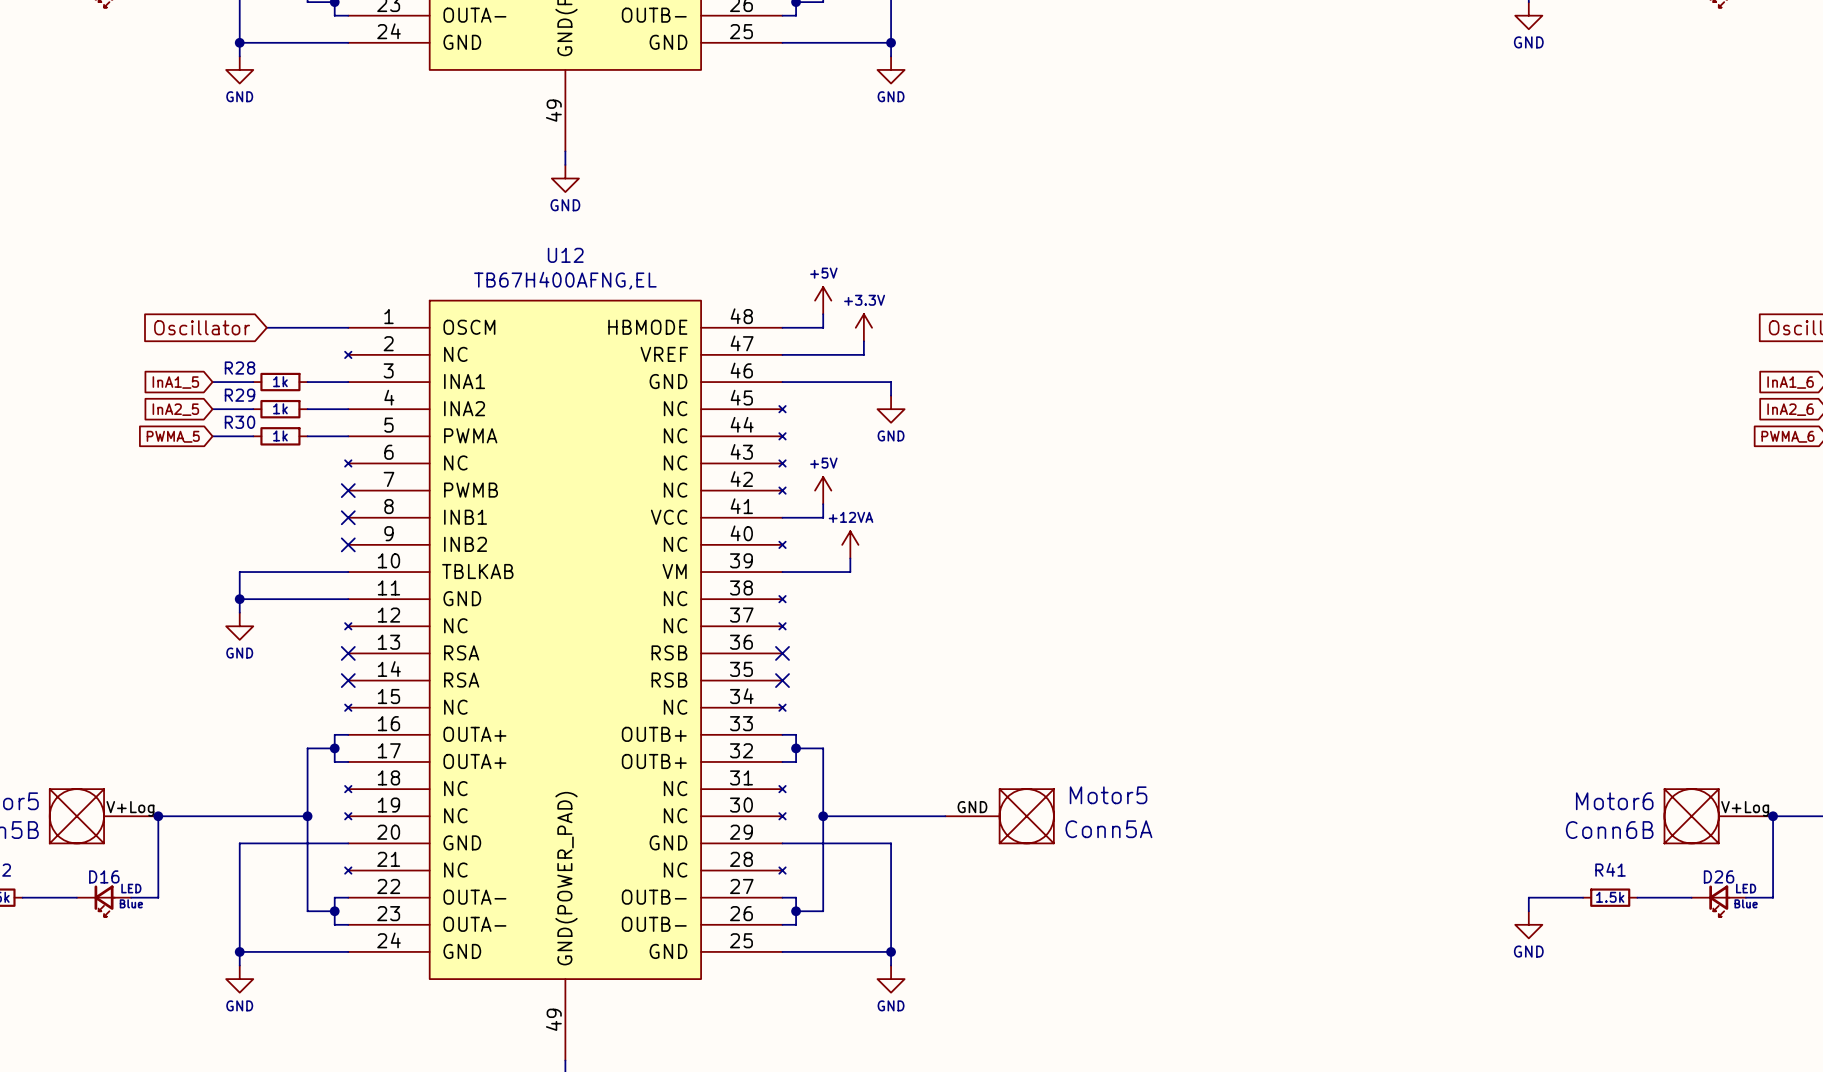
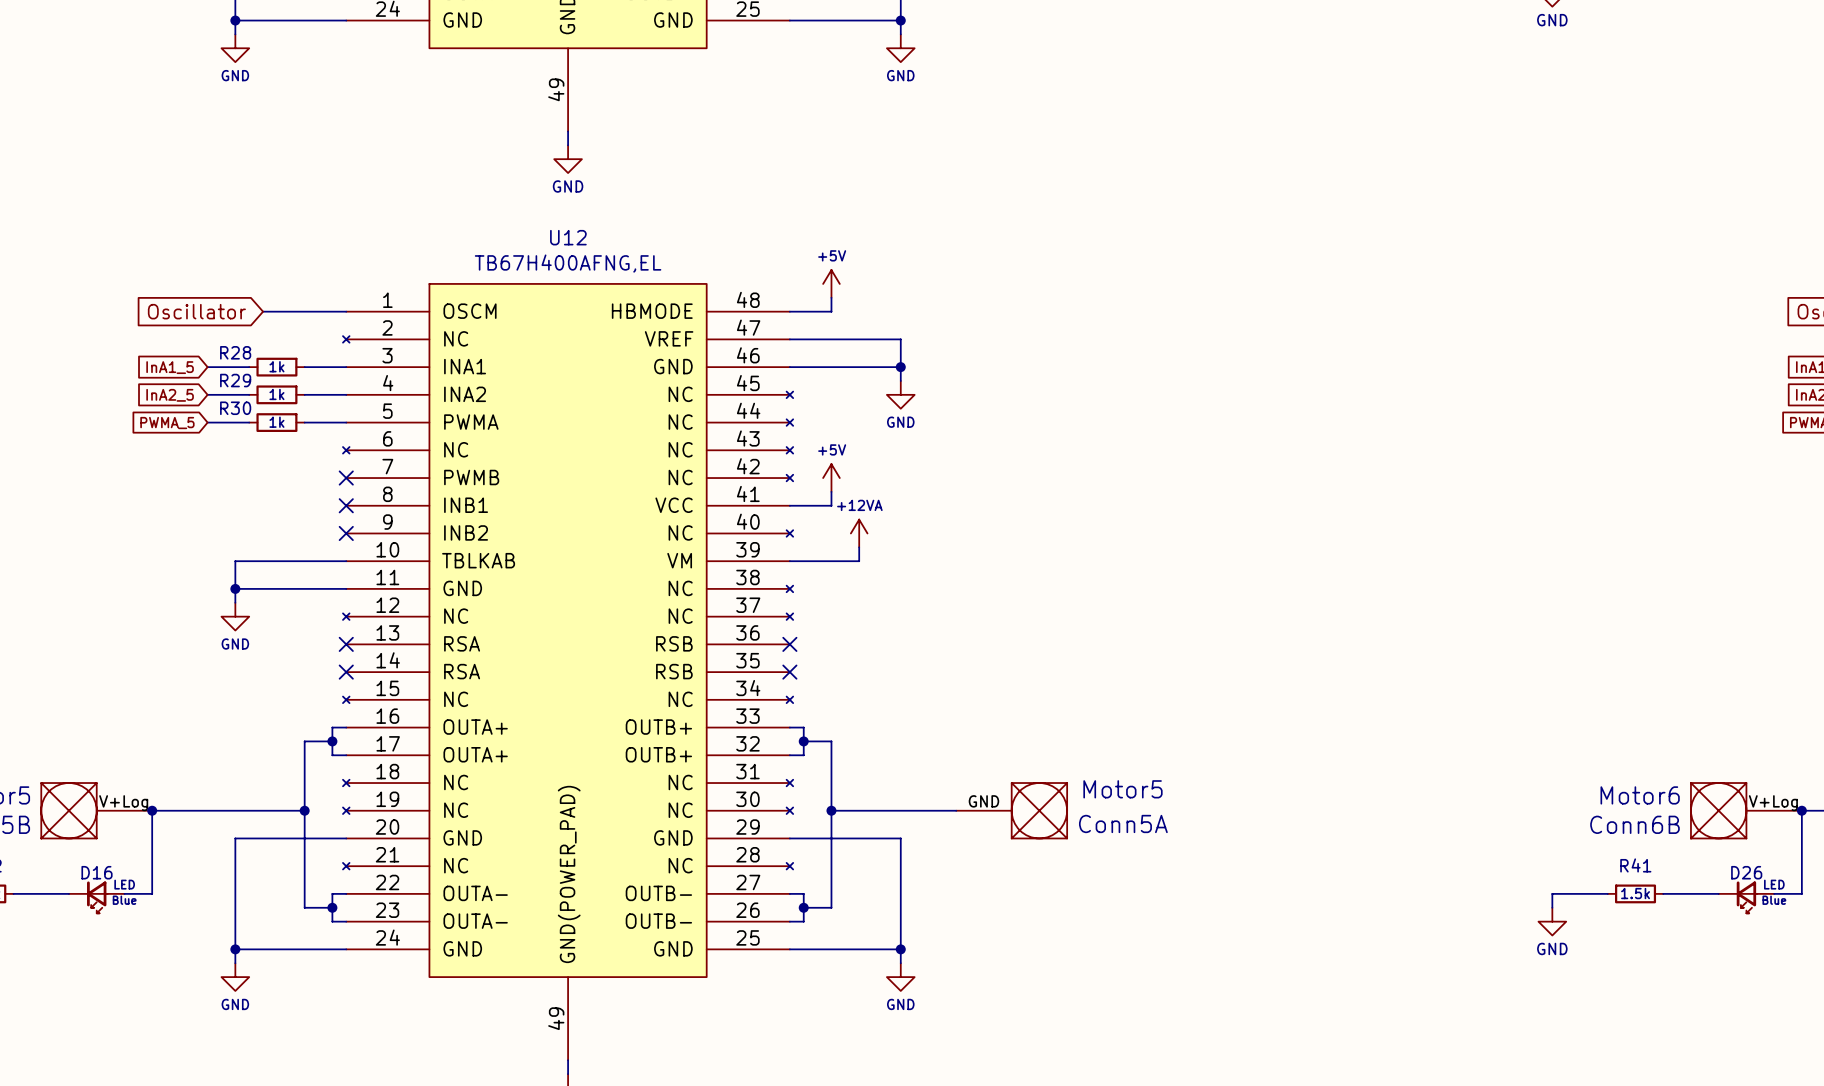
power symbol: +3.3V (863, 327) -> none
wire: (863, 341) (863, 354) -> (900, 367) (900, 339) (873, 339)
junction: none -> (900, 367)

